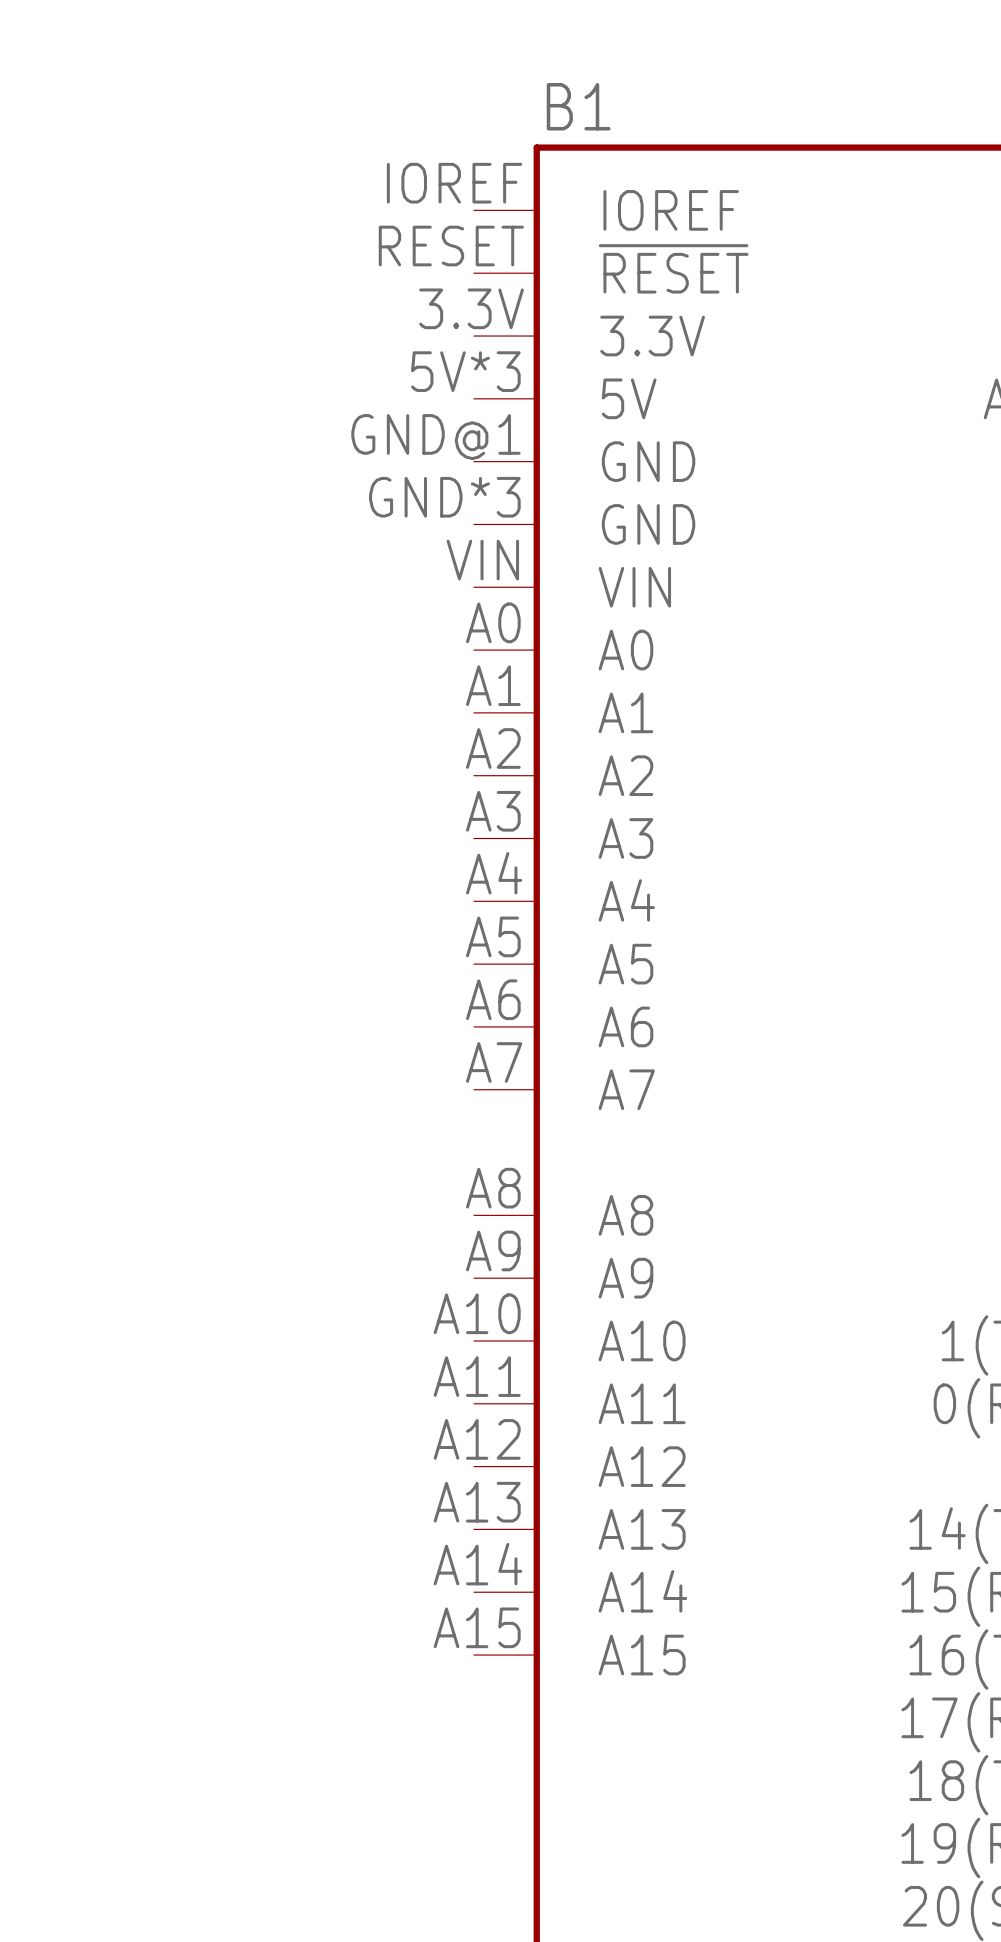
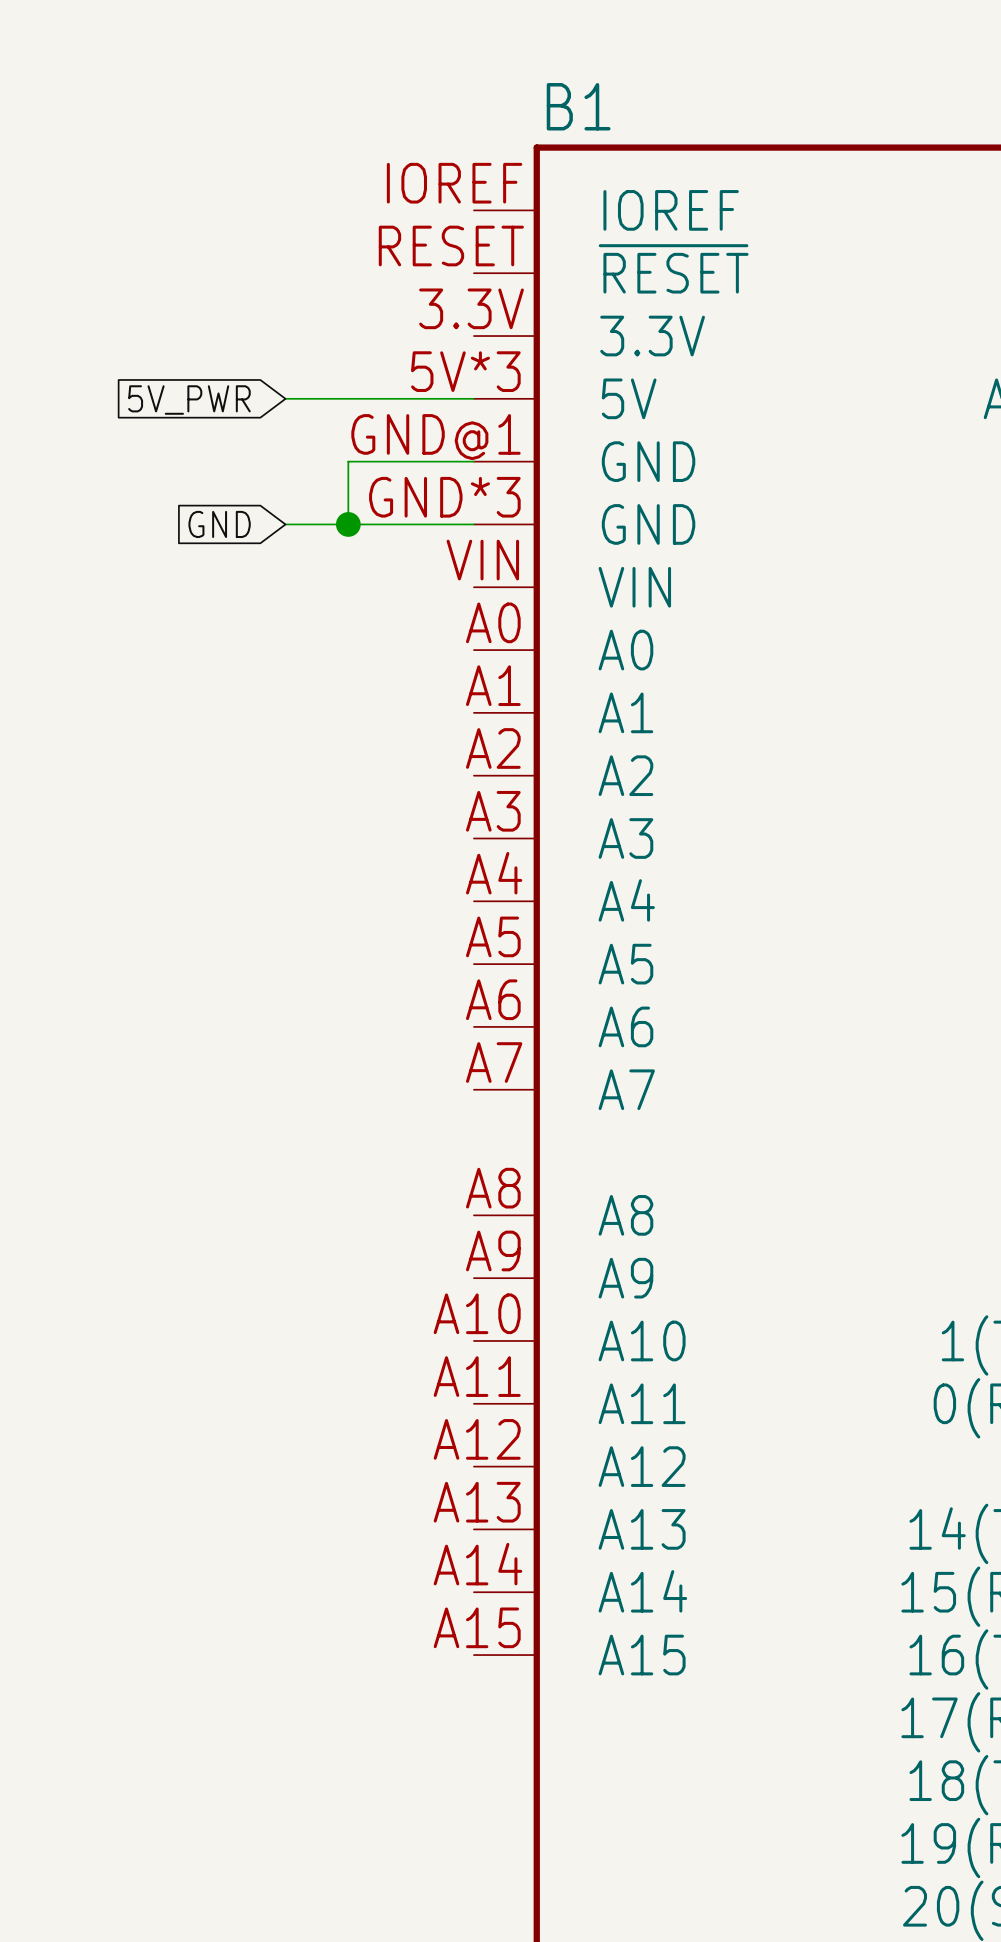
wire: none -> (285, 398) (473, 398)
global label: none -> 5V_PWR (189, 400)
wire: none -> (473, 461) (348, 461) (348, 524)
global label: none -> GND (219, 524)
wire: none -> (285, 524) (473, 524)
junction: none -> (348, 524)

